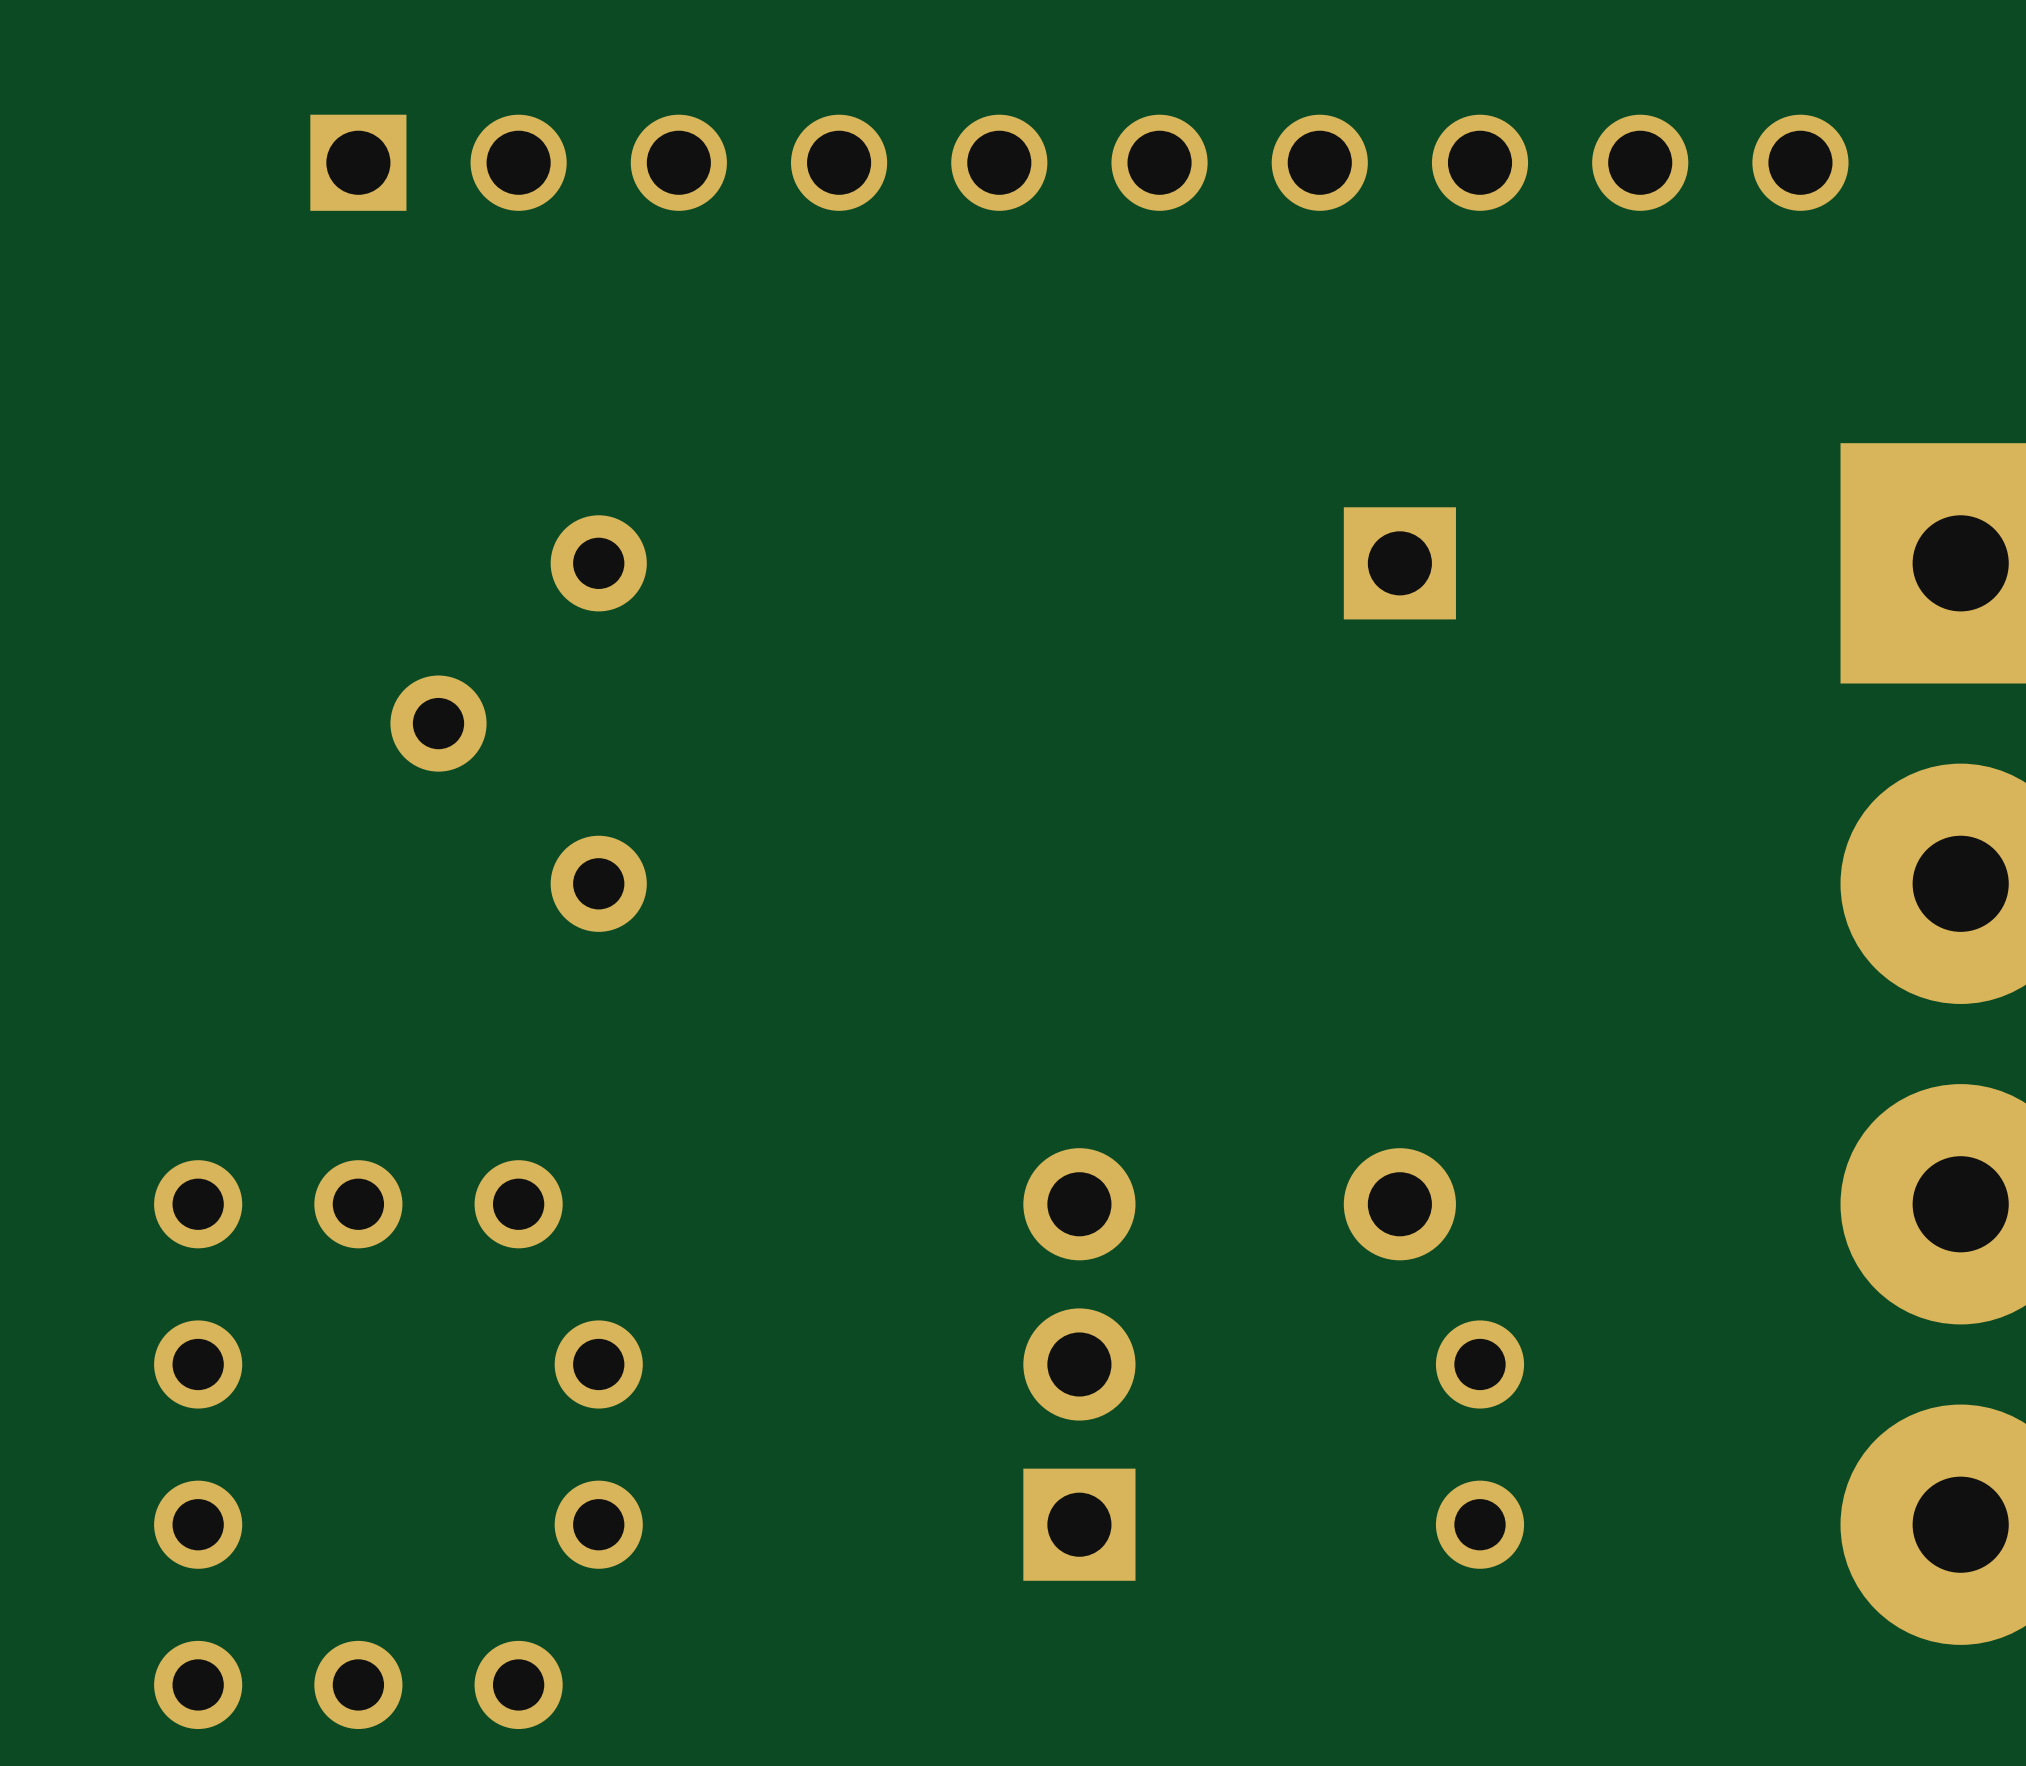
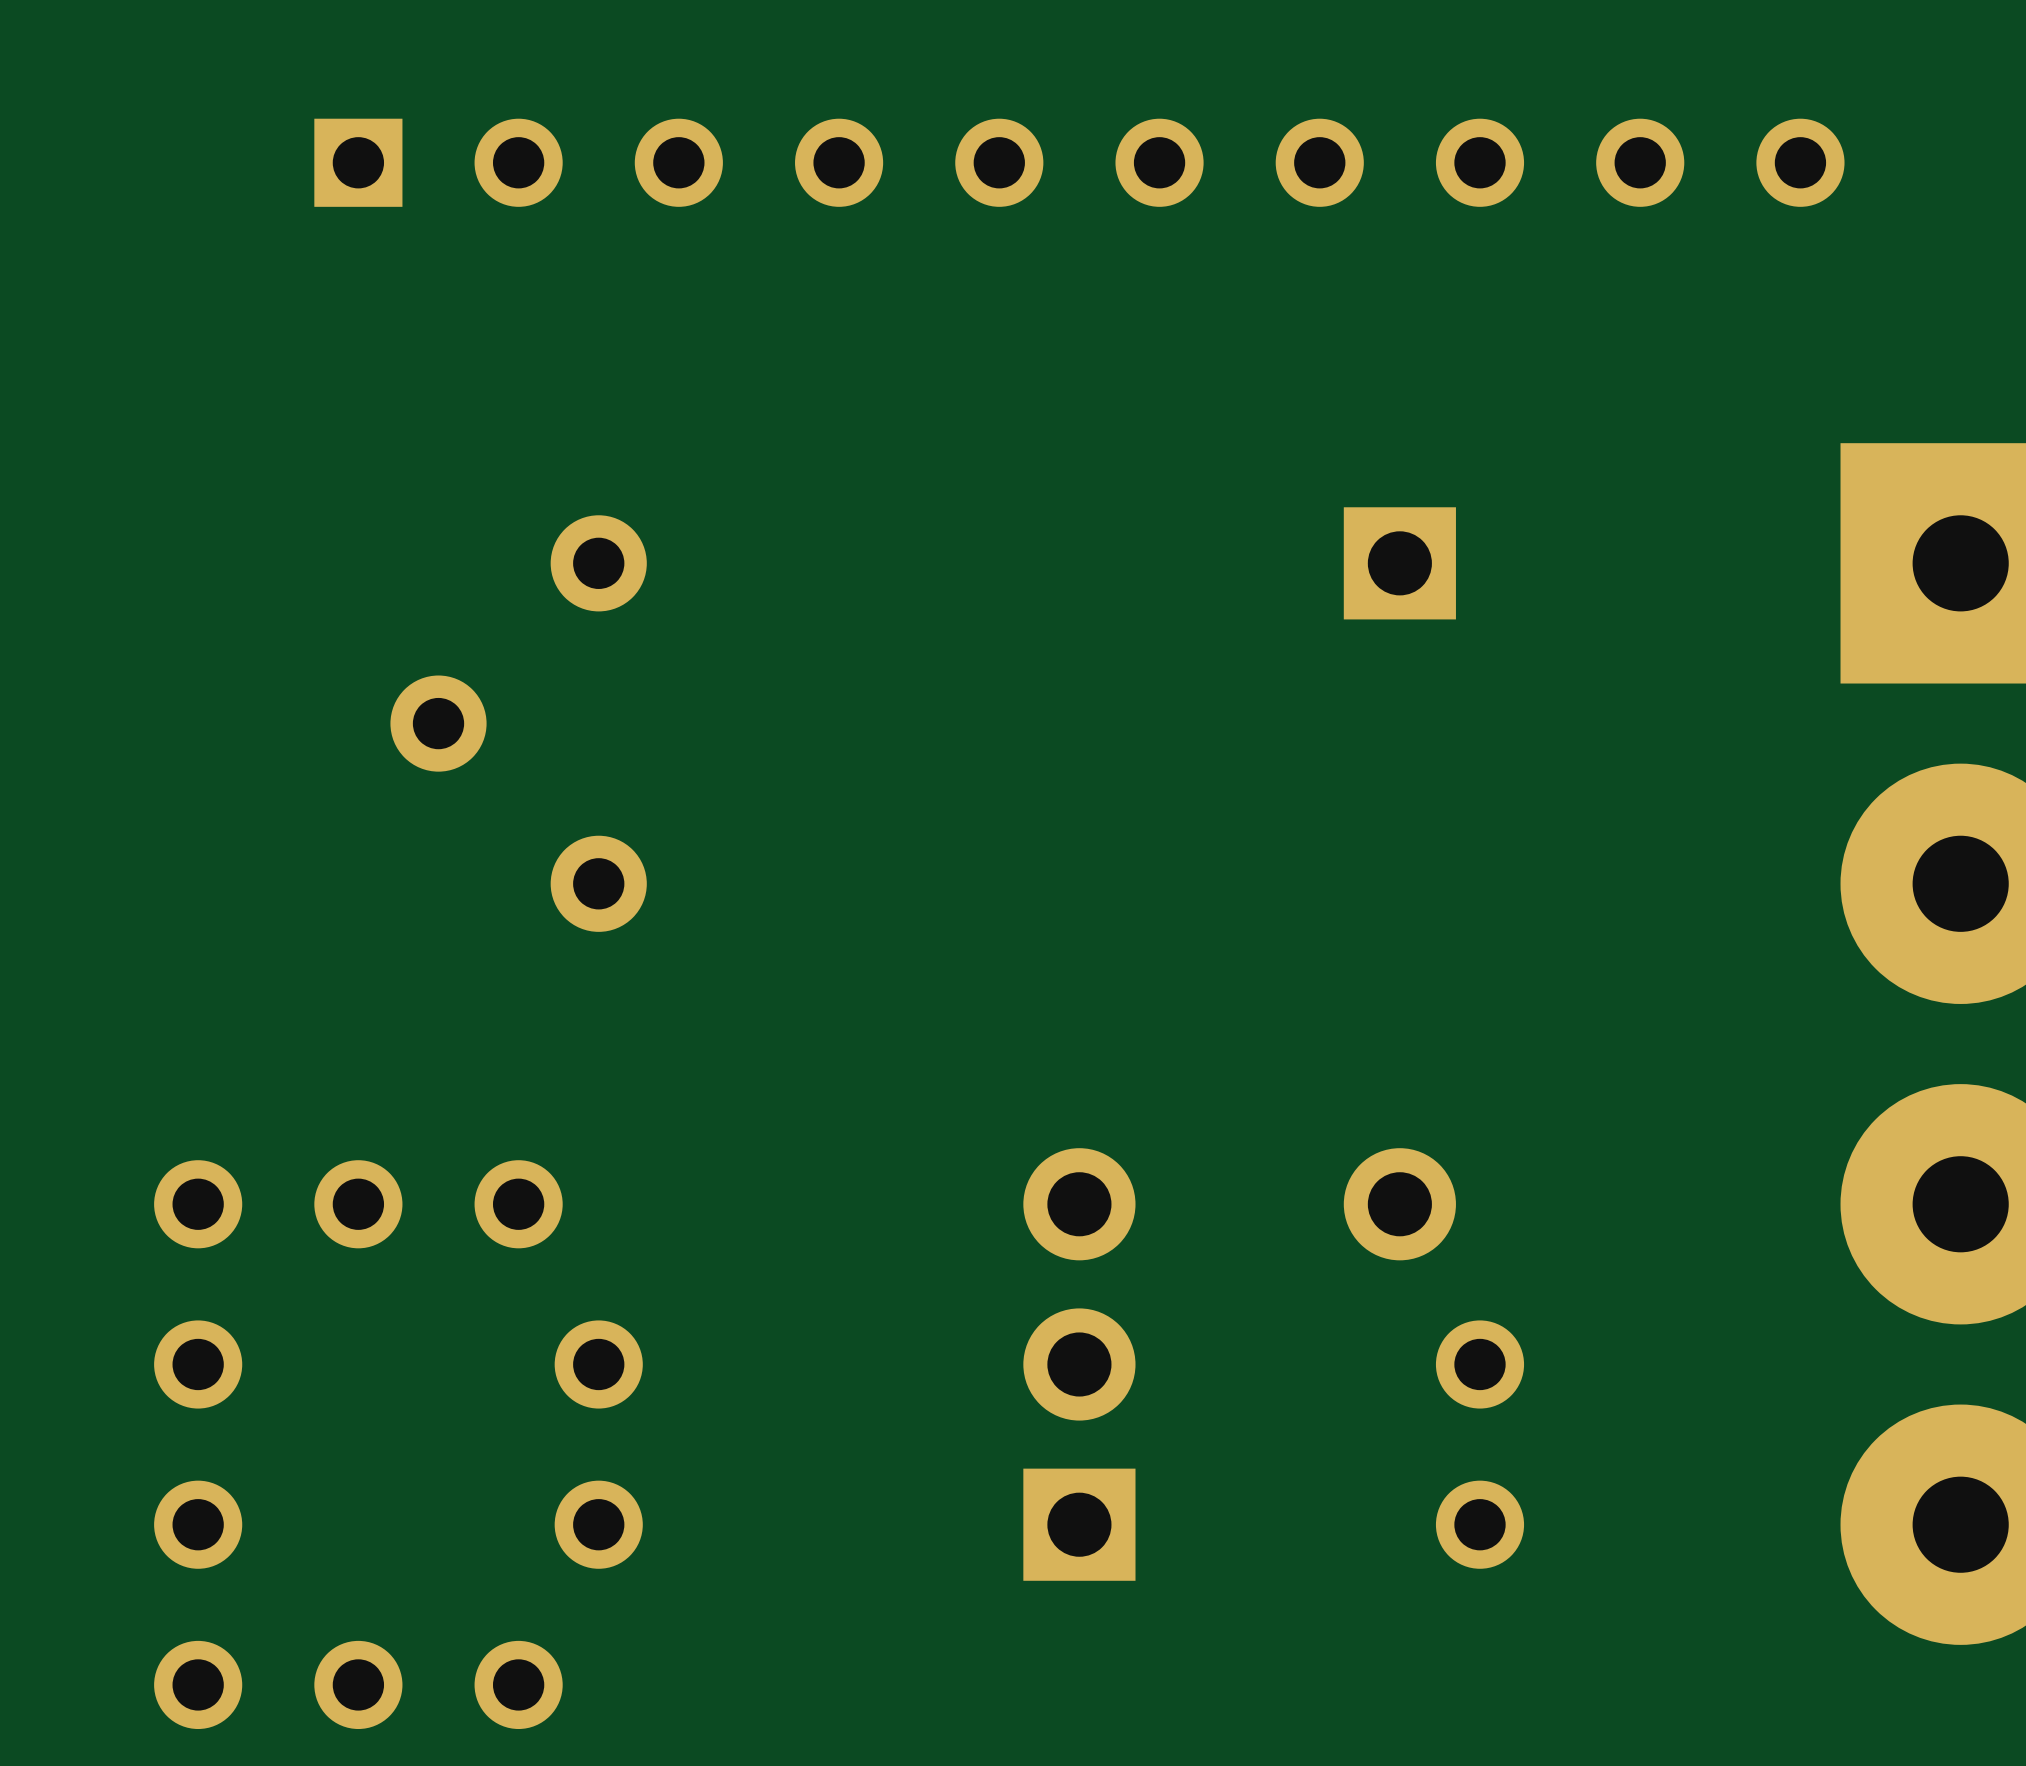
part footprint: [310, 114, 1849, 211] -> [314, 118, 1845, 207]

